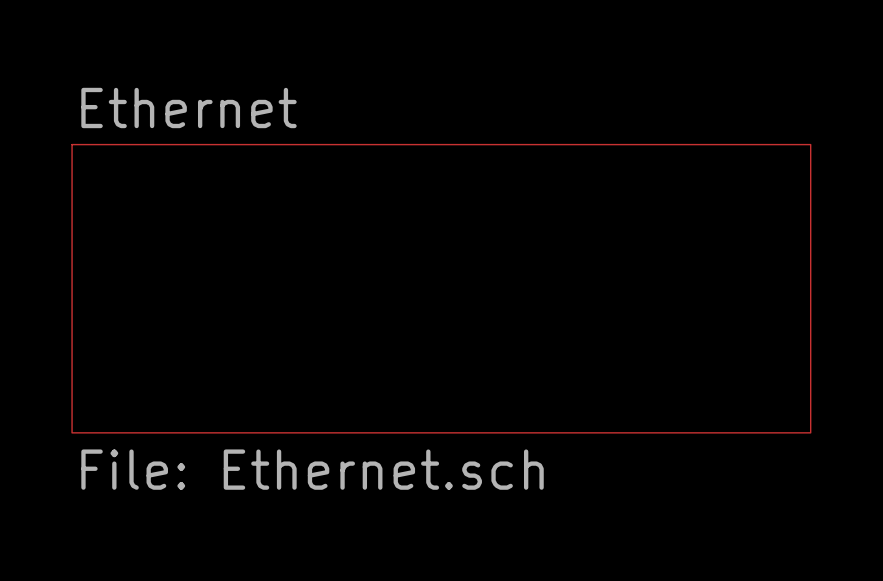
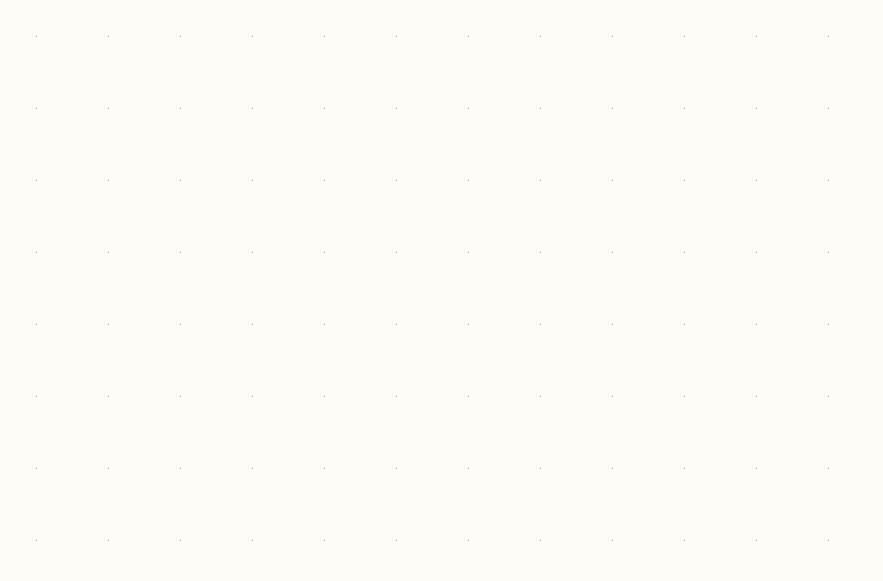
sheet Ethernet: File: Ethernet.sch (441, 288) -> none

